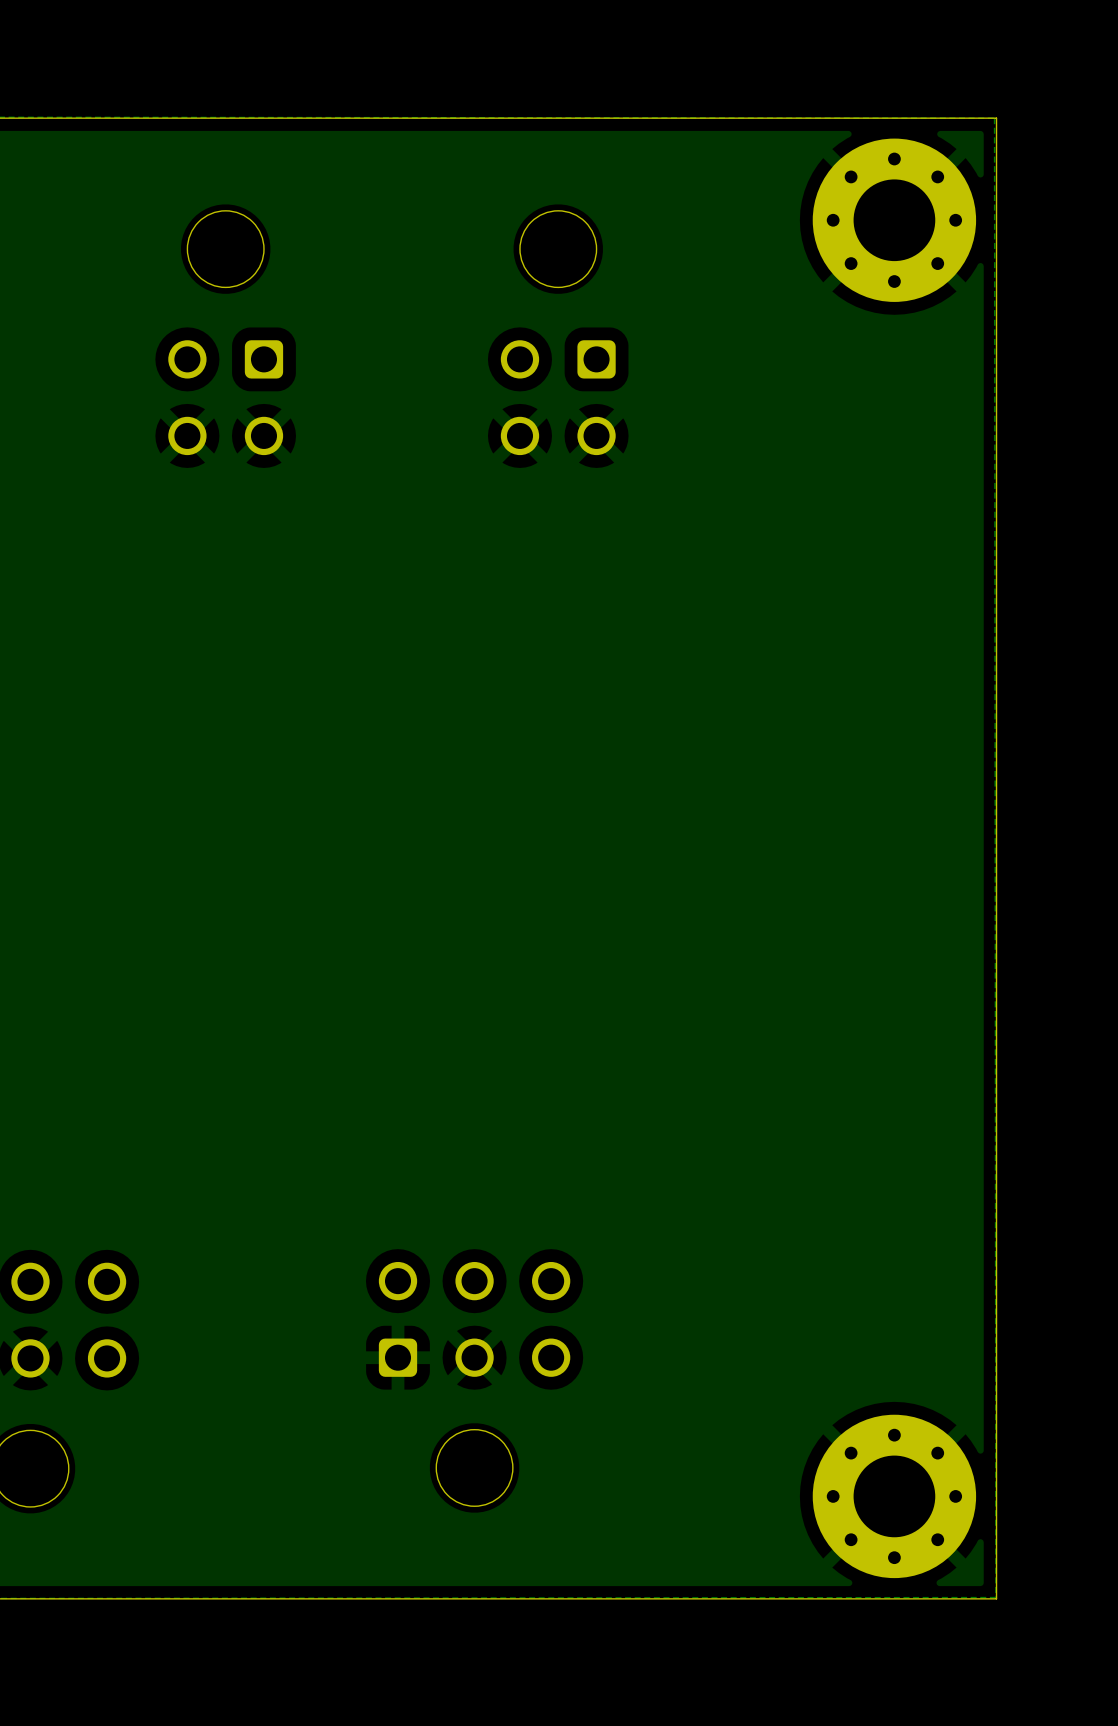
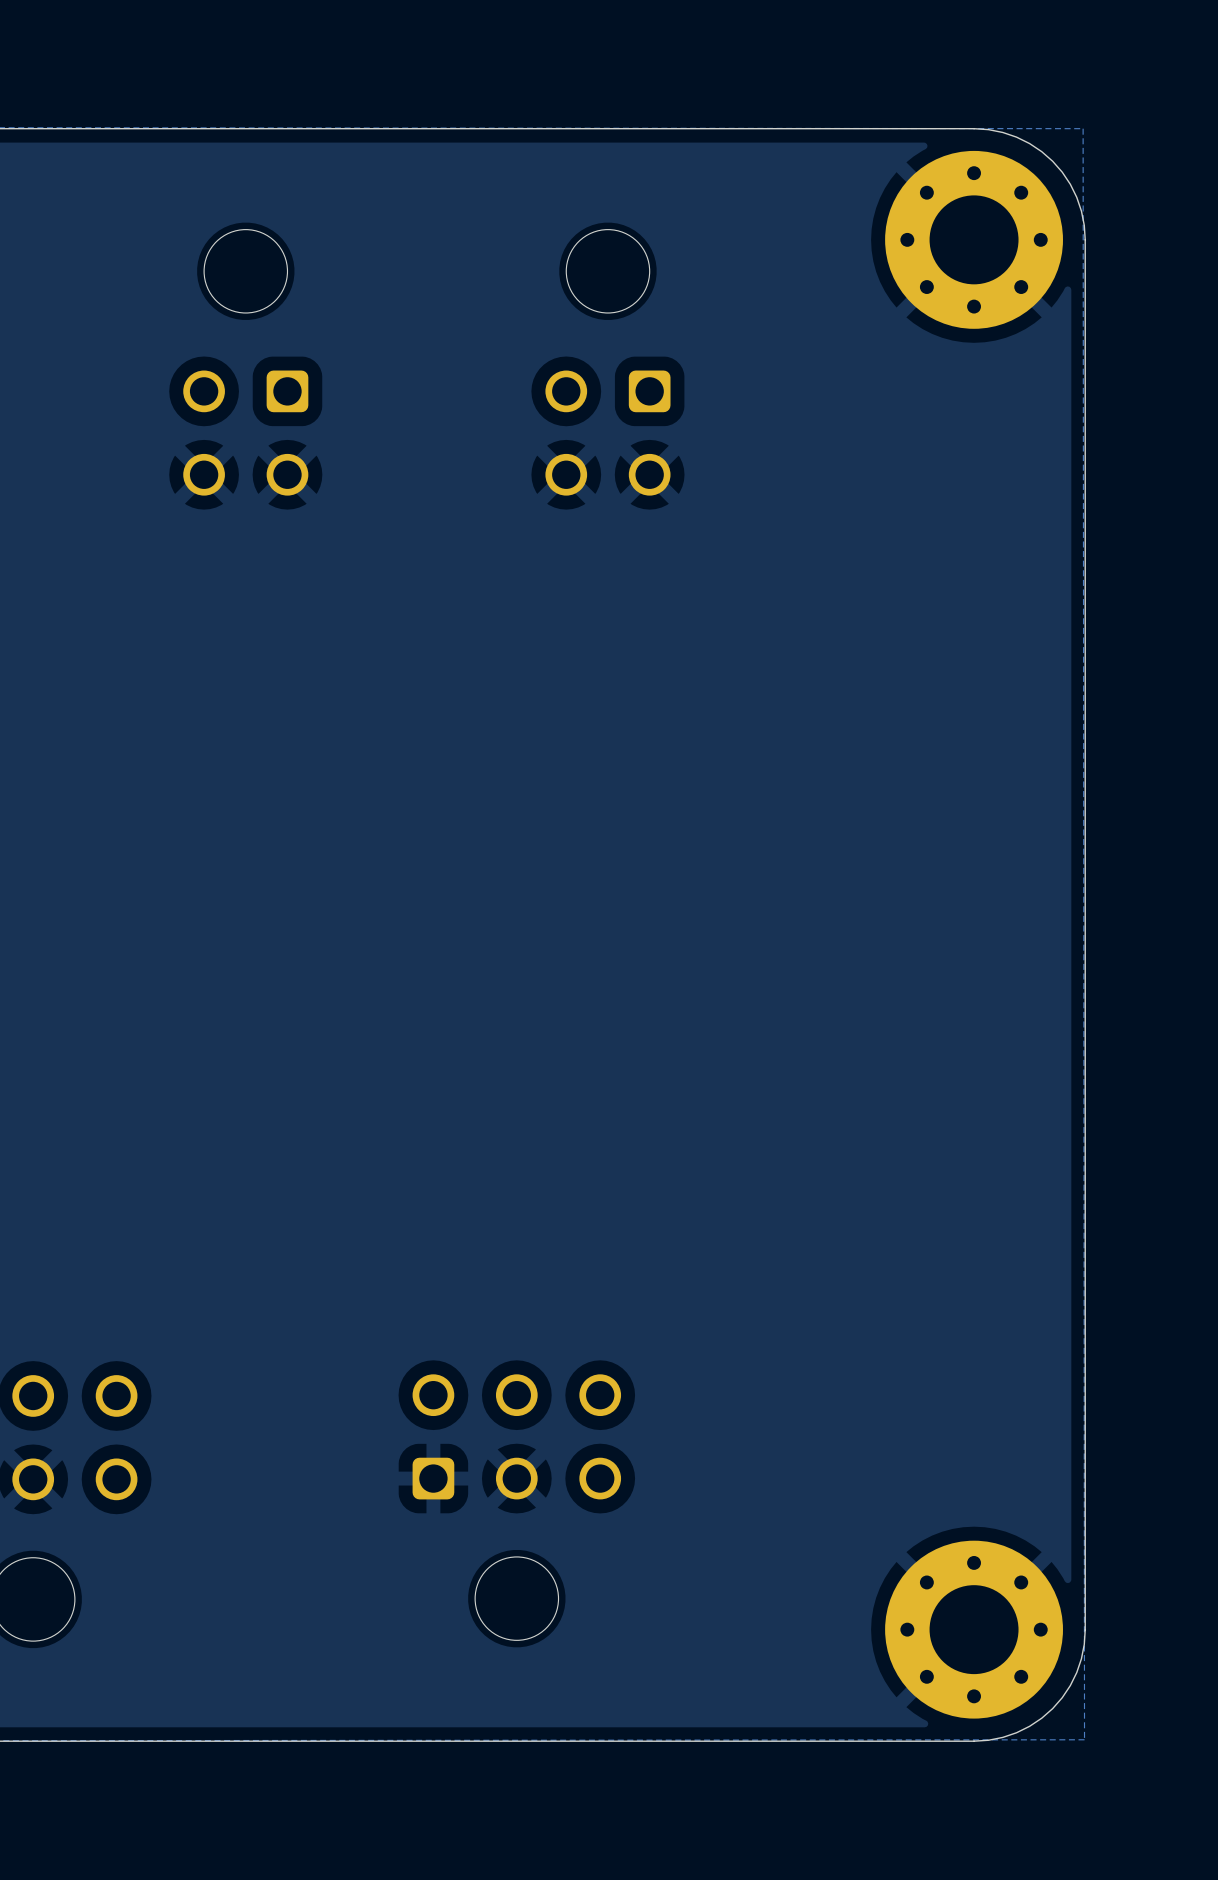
board edge: (894, 118) (996, 118) (996, 220) -> (974, 128) (988, 129) (1016, 137) (1029, 143) (1052, 161) (1062, 172) (1076, 197) (1081, 211) (1085, 239)
board edge: (996, 1496) (996, 1598) (894, 1598) -> (1085, 1630) (1081, 1658) (1076, 1672) (1062, 1697) (1052, 1708) (1041, 1718) (1016, 1732) (988, 1740) (974, 1741)

